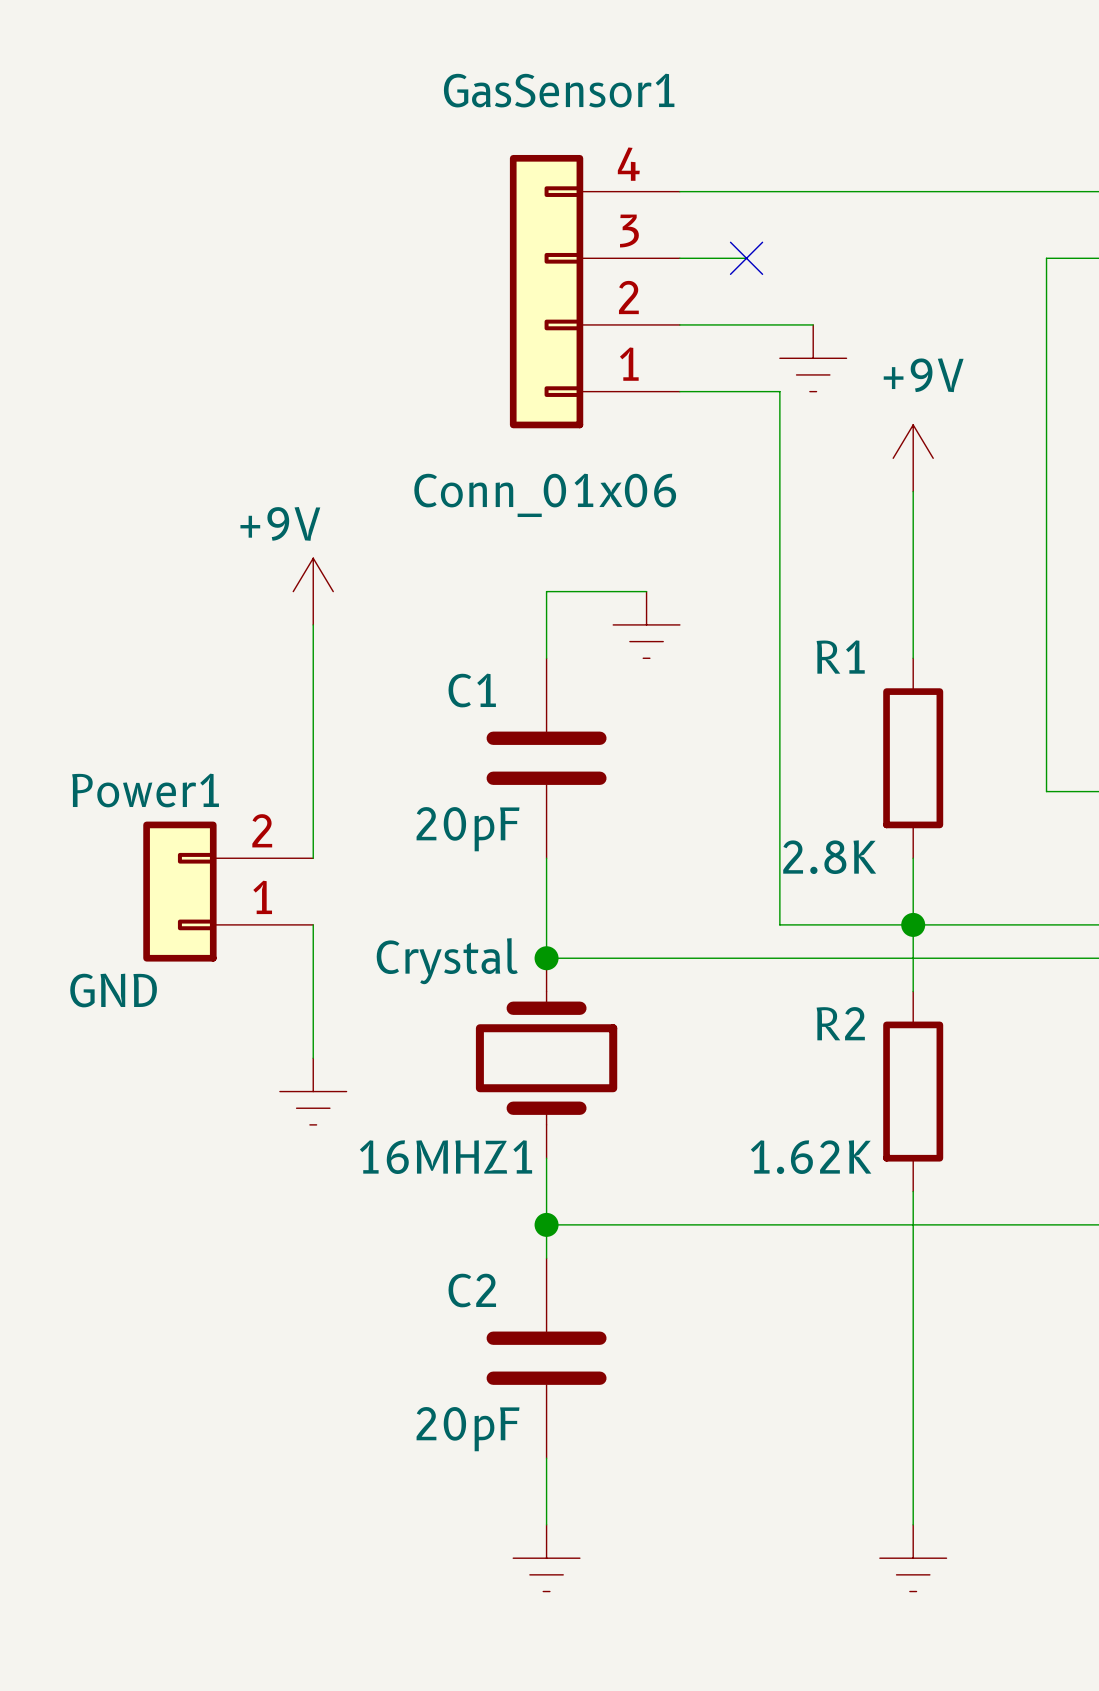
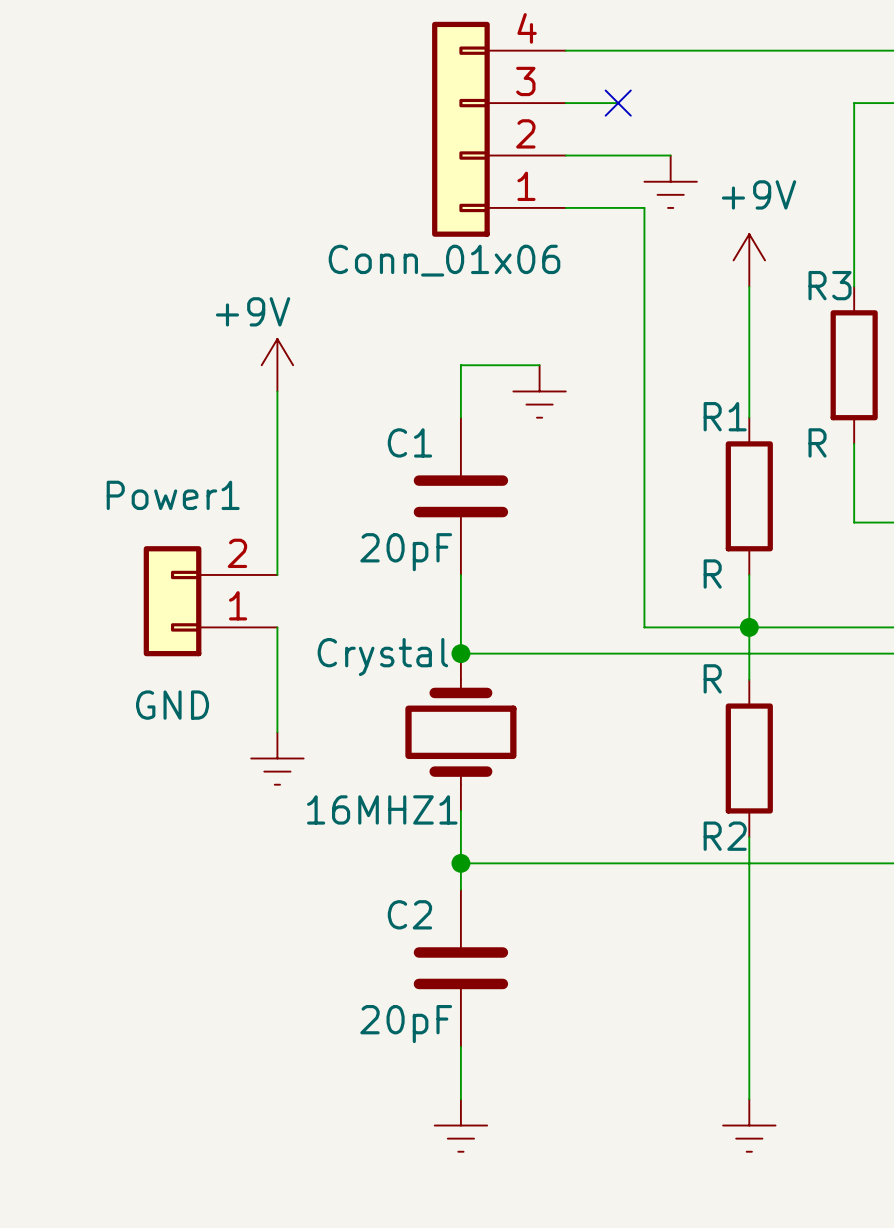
wire: (1046, 491) (1046, 691) -> none
GasSensor1 value position: Conn_01x06 (545, 495) -> Conn_01x06 (444, 260)
R3: none -> R (854, 365)
R1 name position: R1 (840, 657) -> R1 (725, 416)
Power1 name position: Power1 (145, 790) -> Power1 (173, 495)
R1 value: 2.8K (829, 857) -> R (712, 574)
Power1 value position: GND (113, 990) -> GND (172, 705)
R2 name position: R2 (840, 1023) -> R2 (725, 836)
R2 value: 1.62K (811, 1157) -> R (712, 678)

